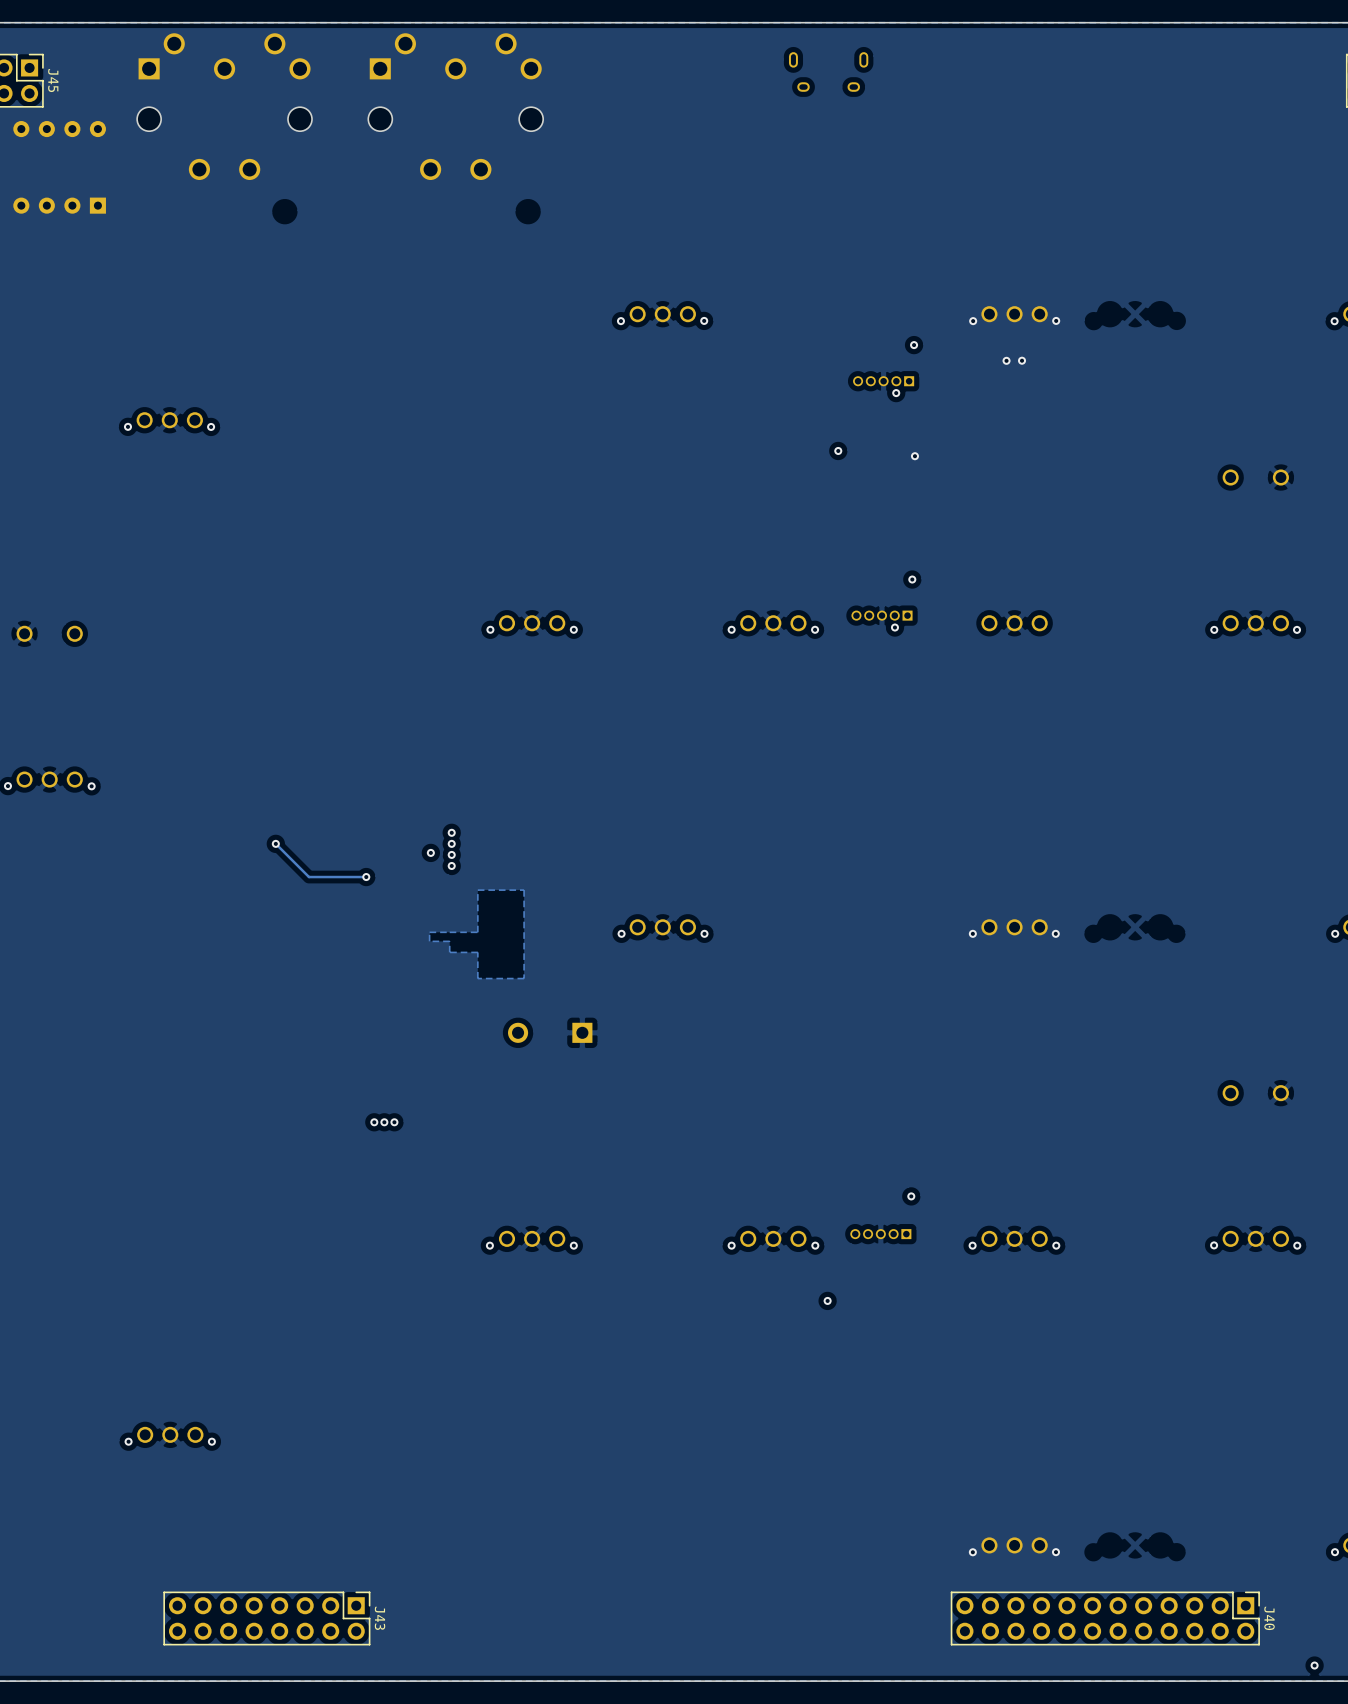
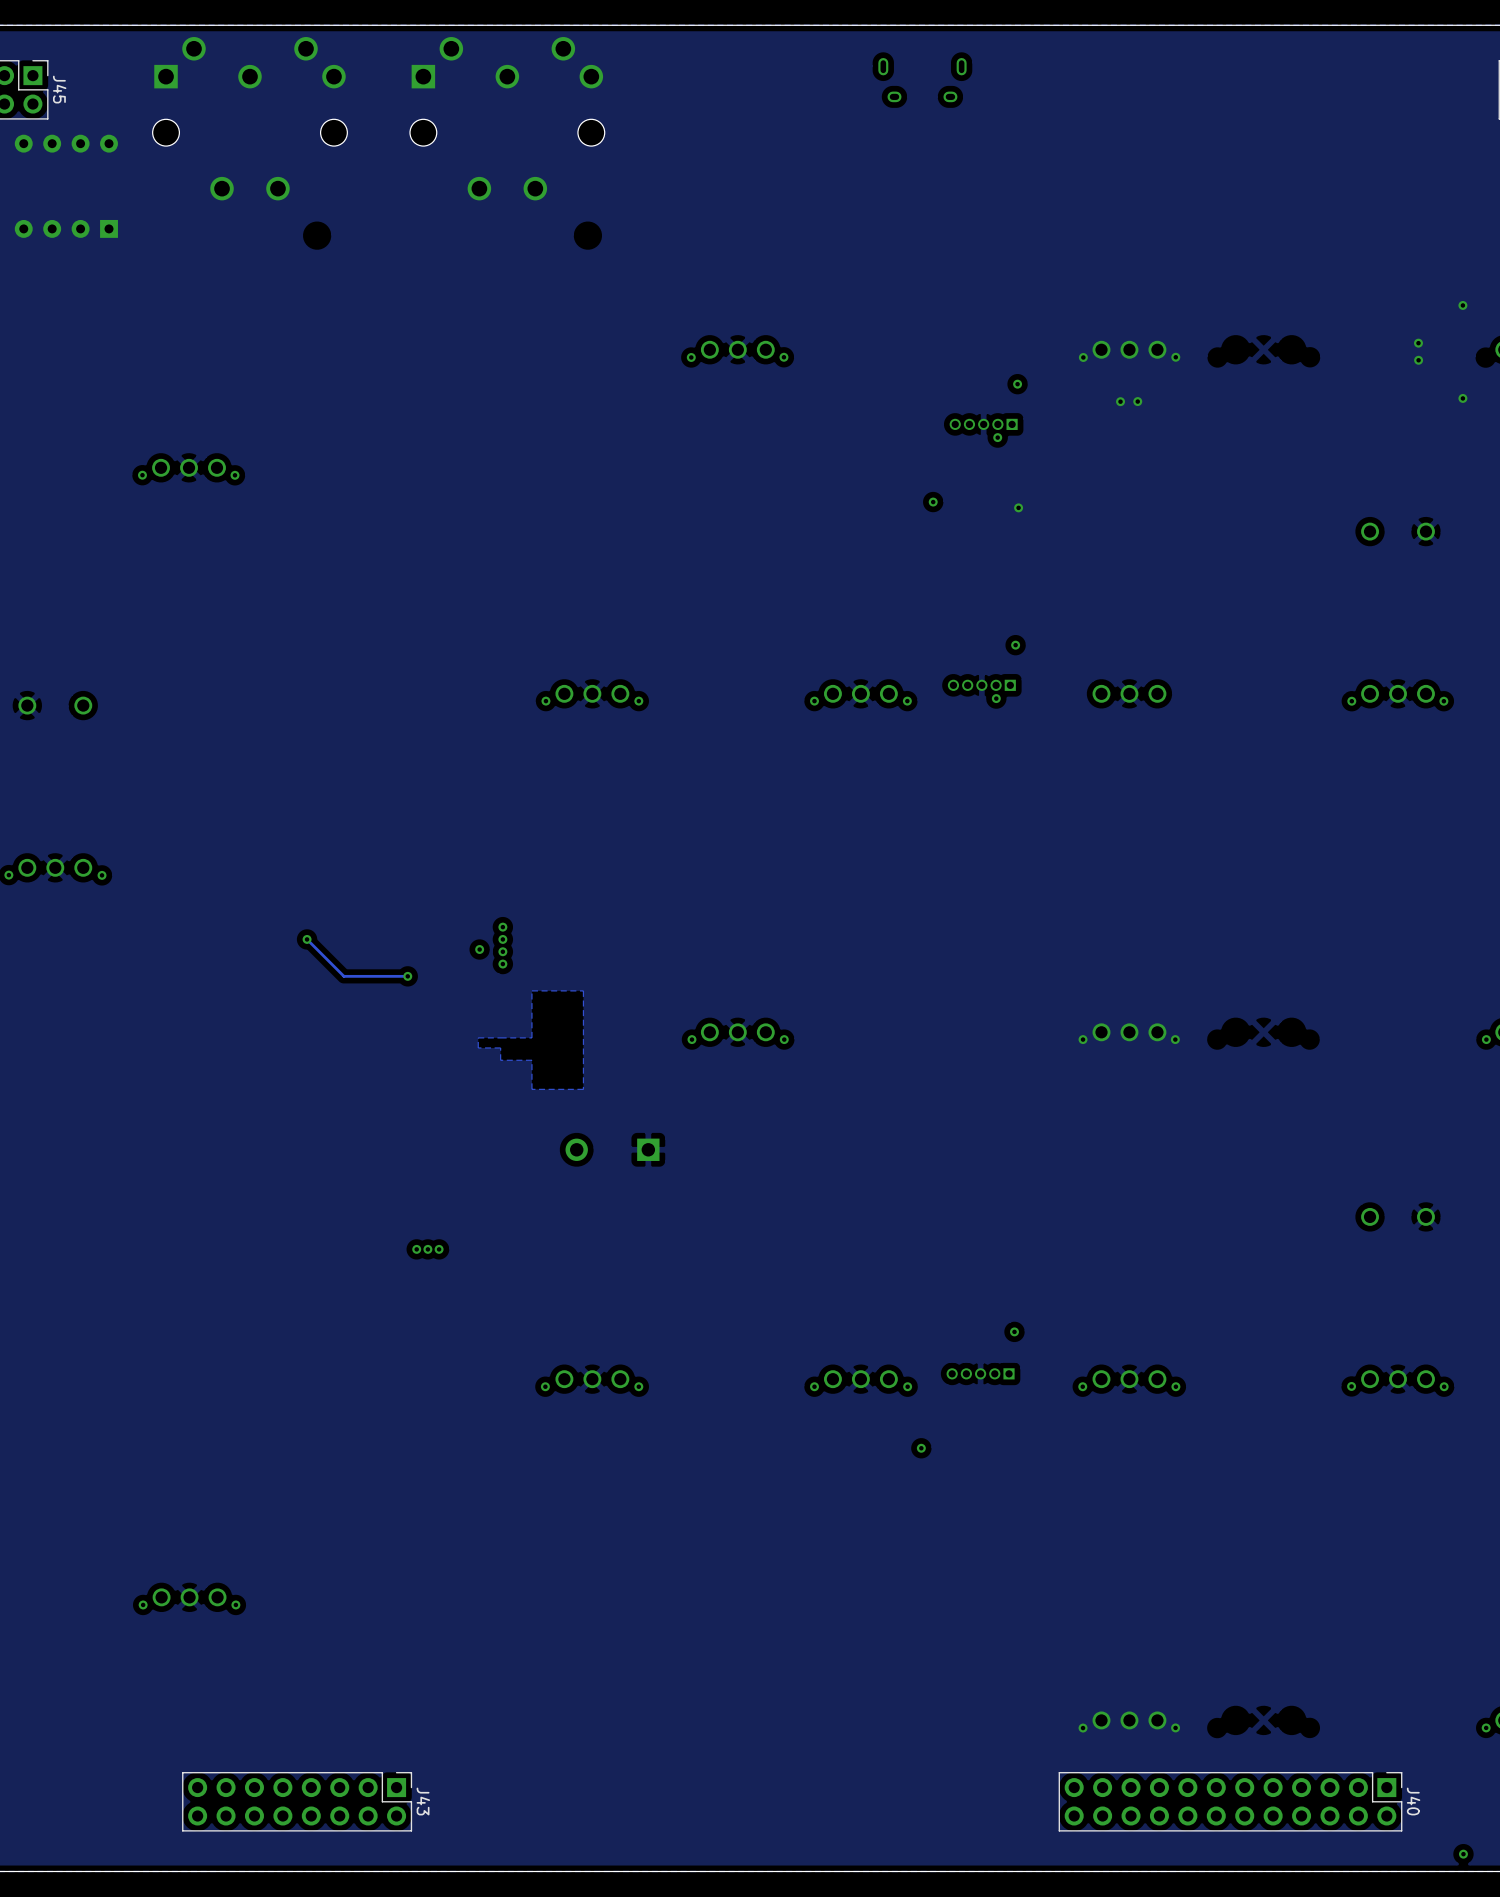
via: none -> (1462, 305)
via: none -> (1418, 343)
via: (1334, 321) -> none
via: none -> (1418, 360)
via: none -> (1462, 398)

